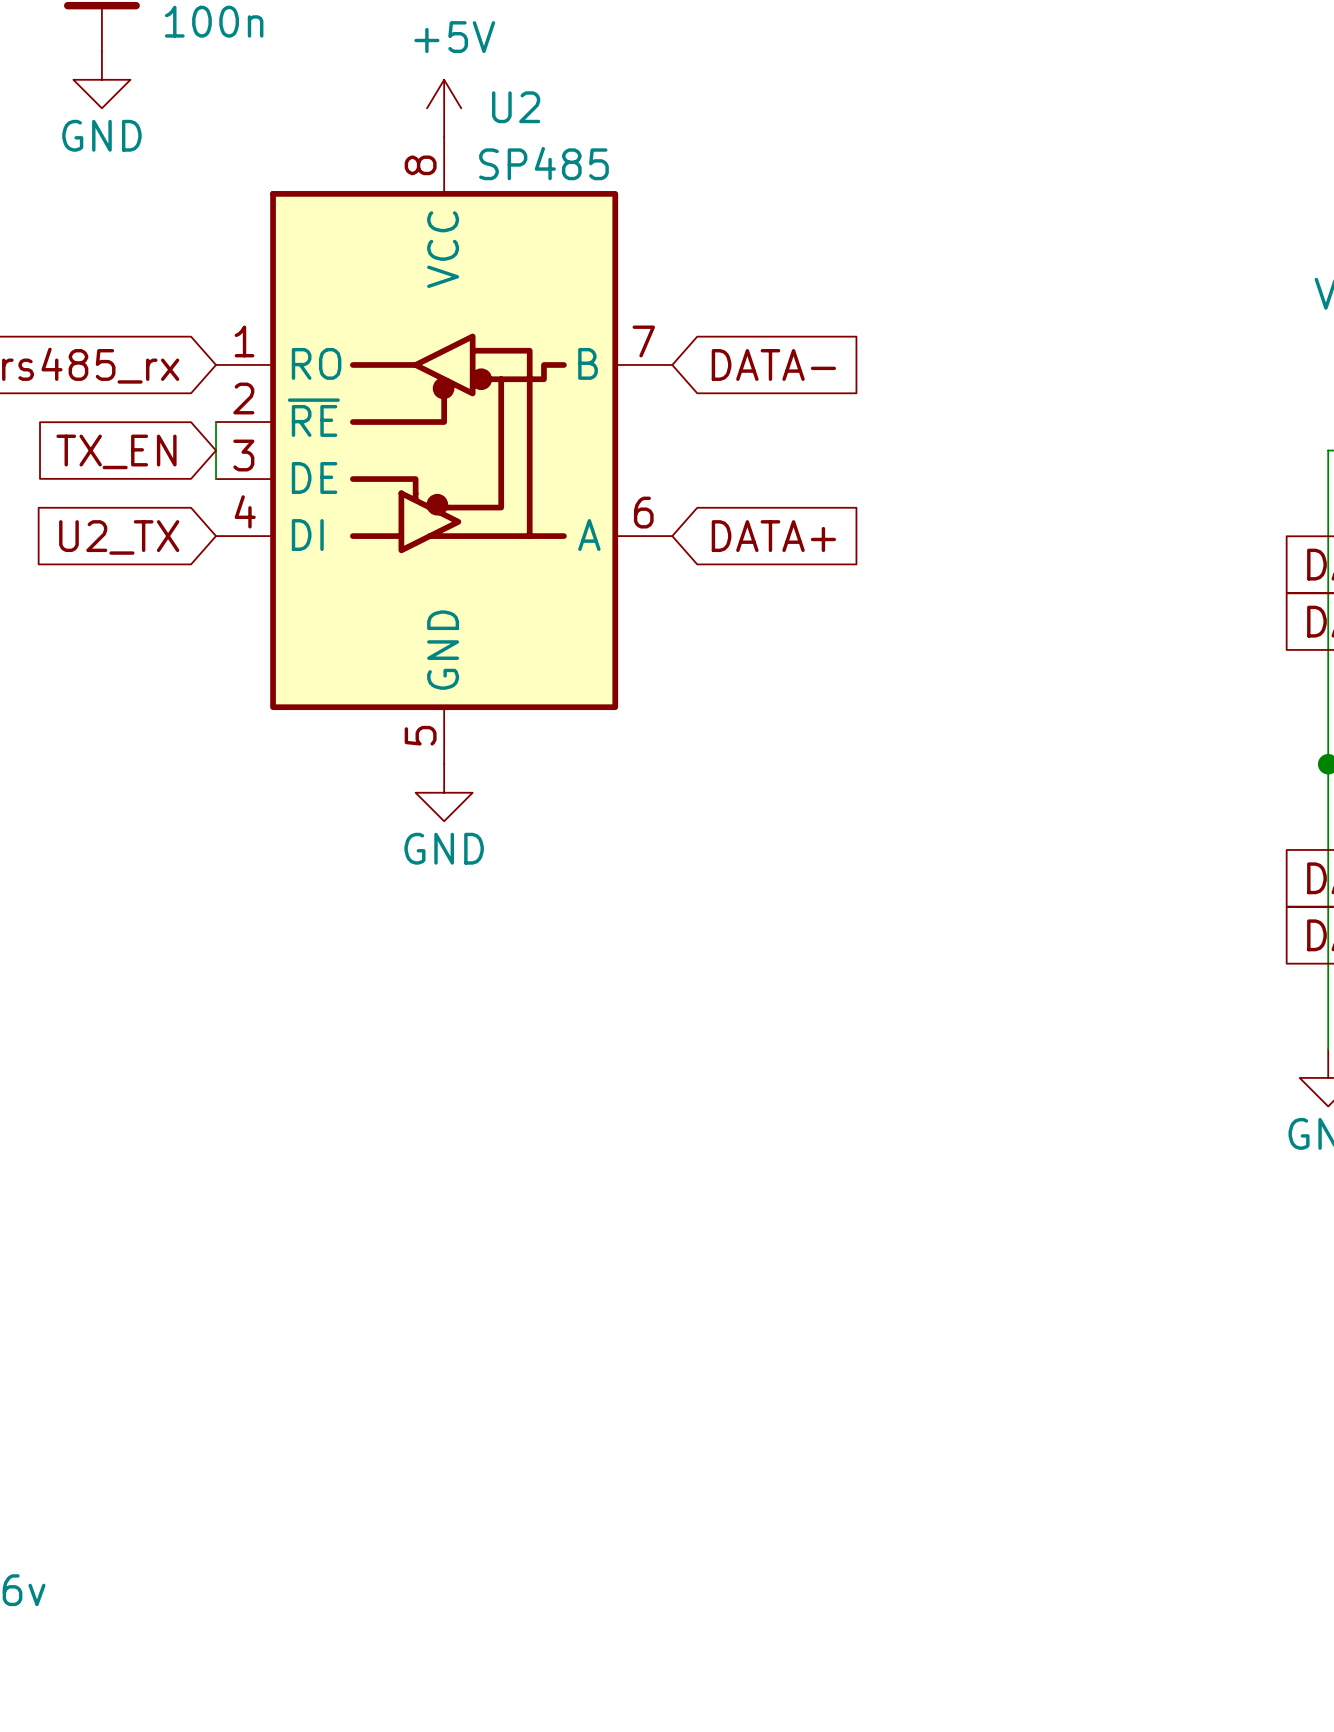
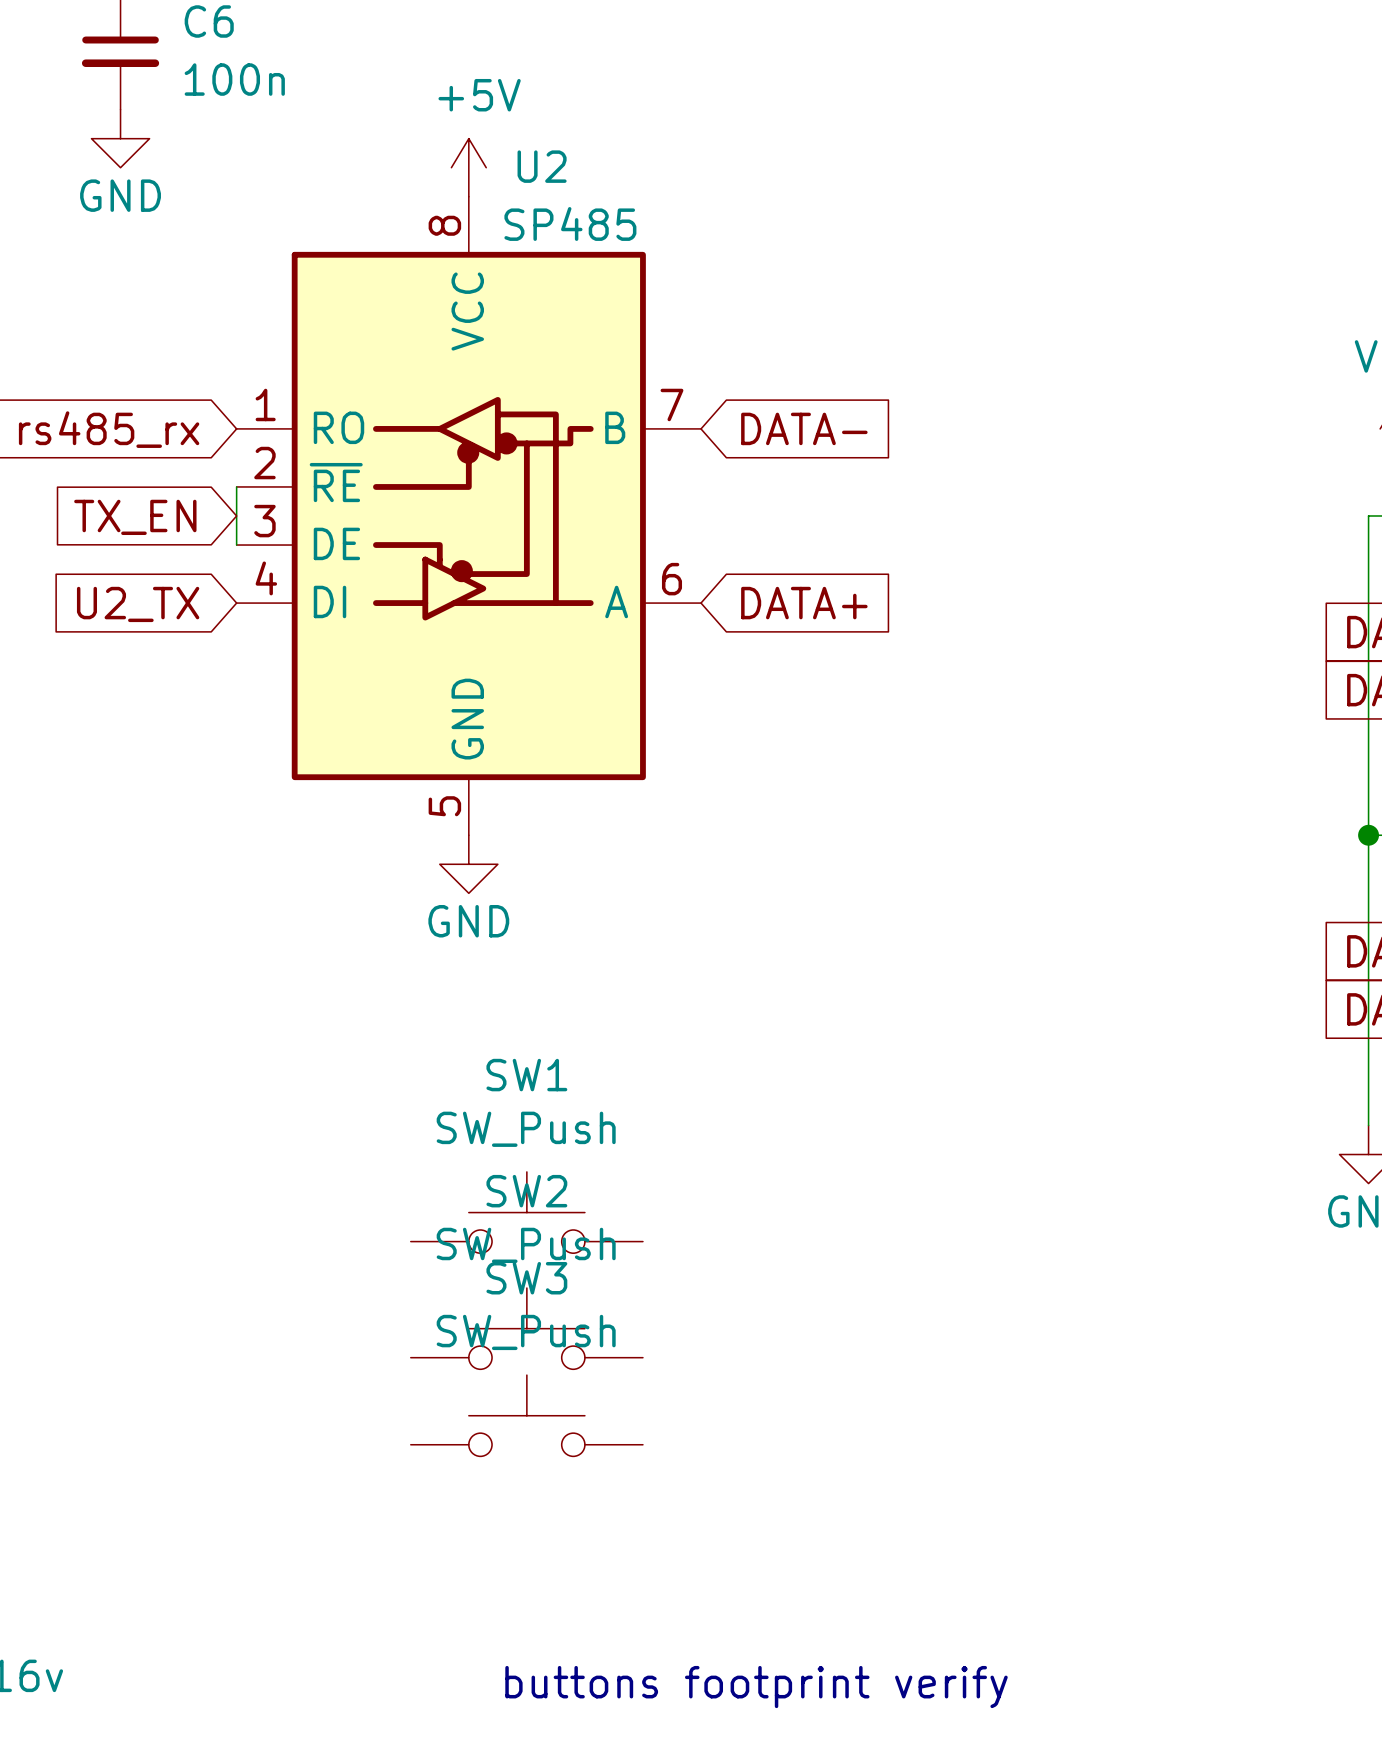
SW1: none -> SW_Push (526, 1212)
SW2: none -> SW_Push (526, 1328)
SW3: none -> SW_Push (526, 1415)
text: none -> buttons footprint verify (756, 1687)

